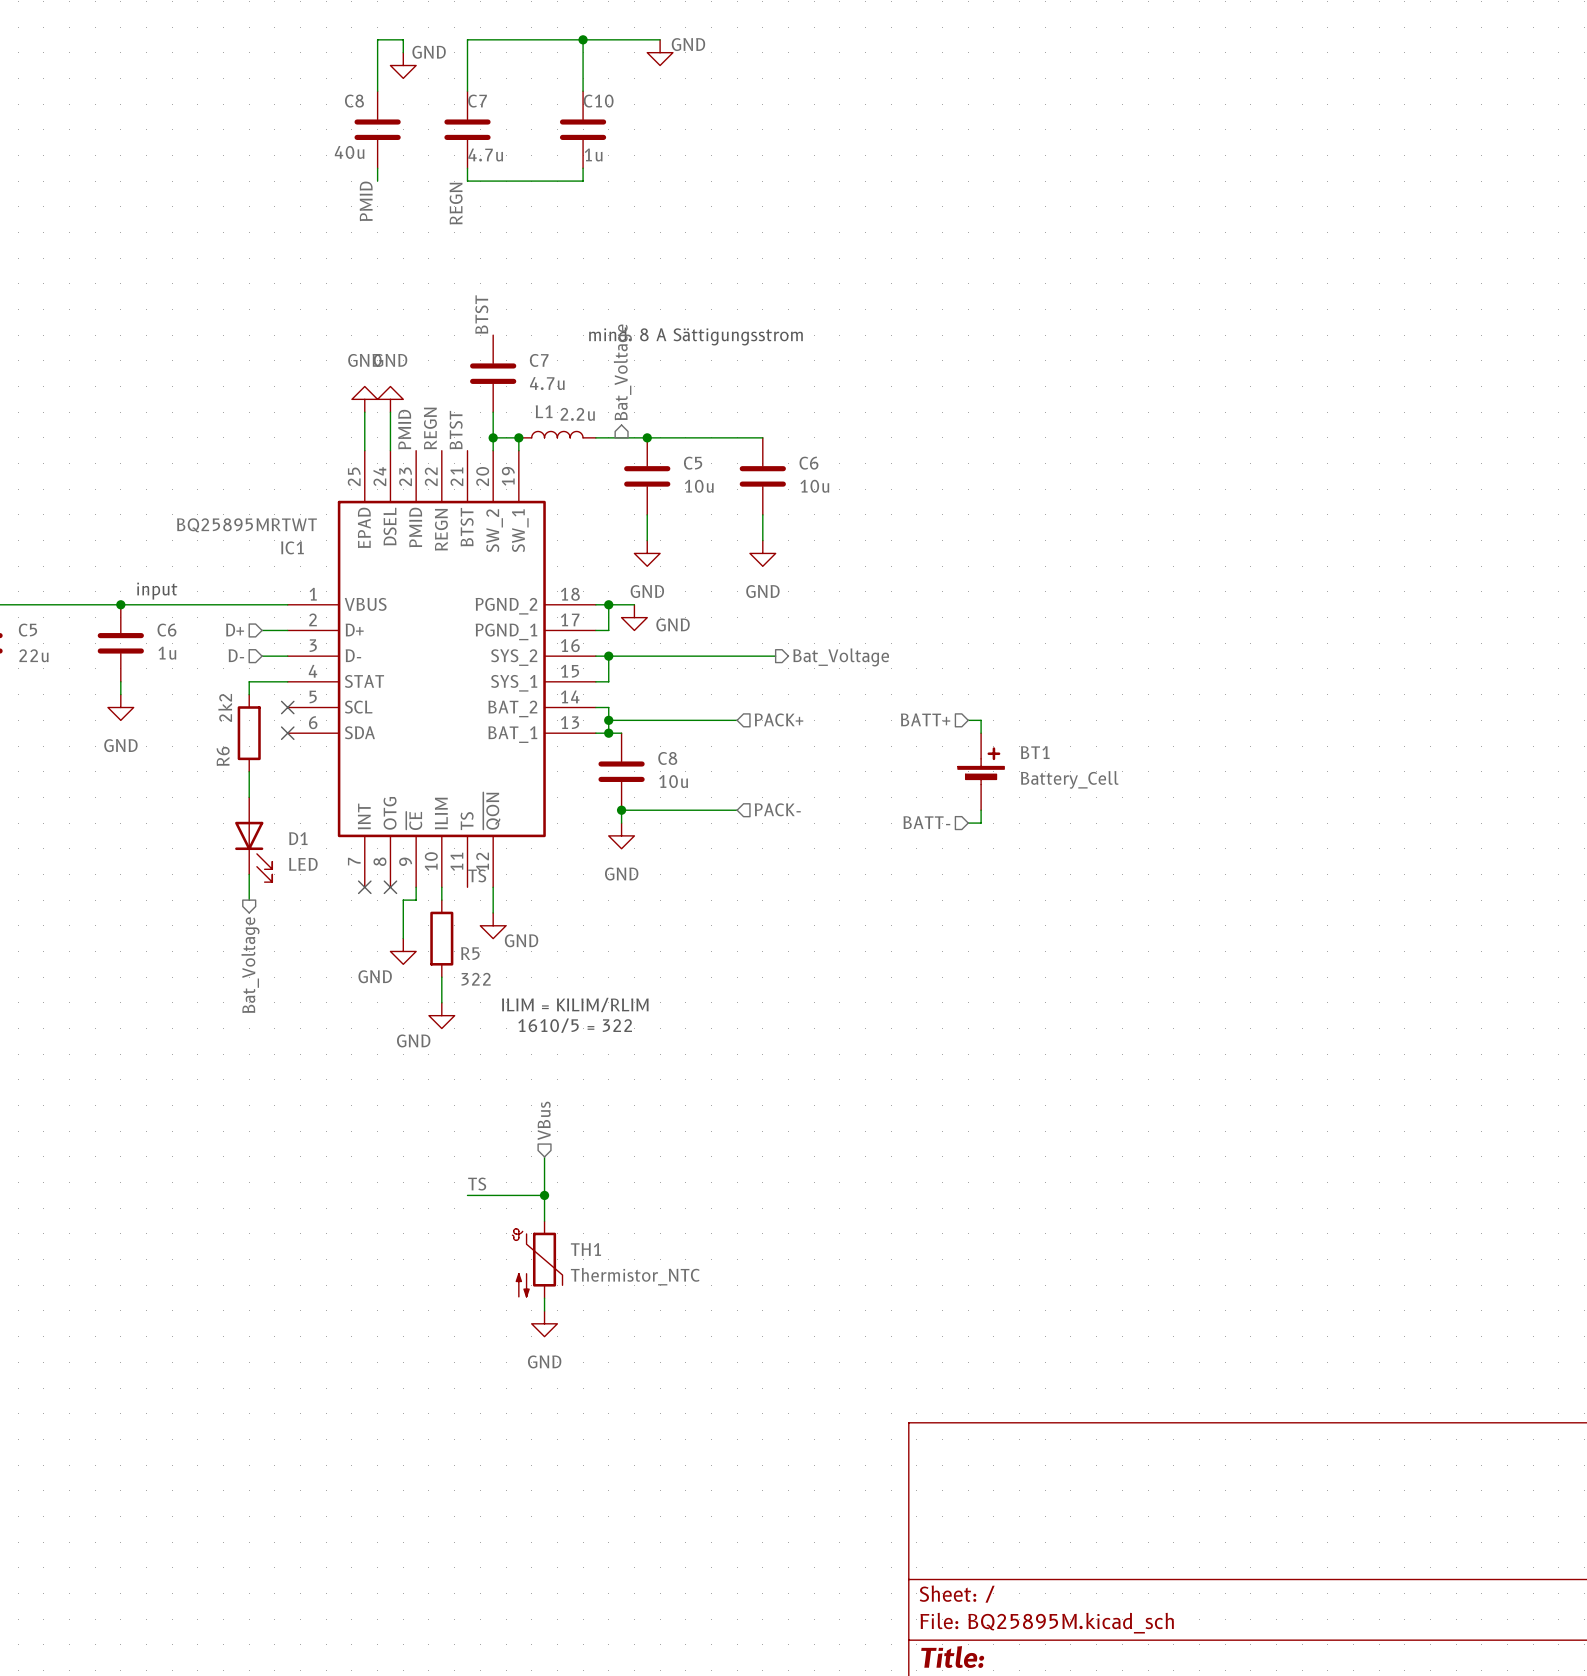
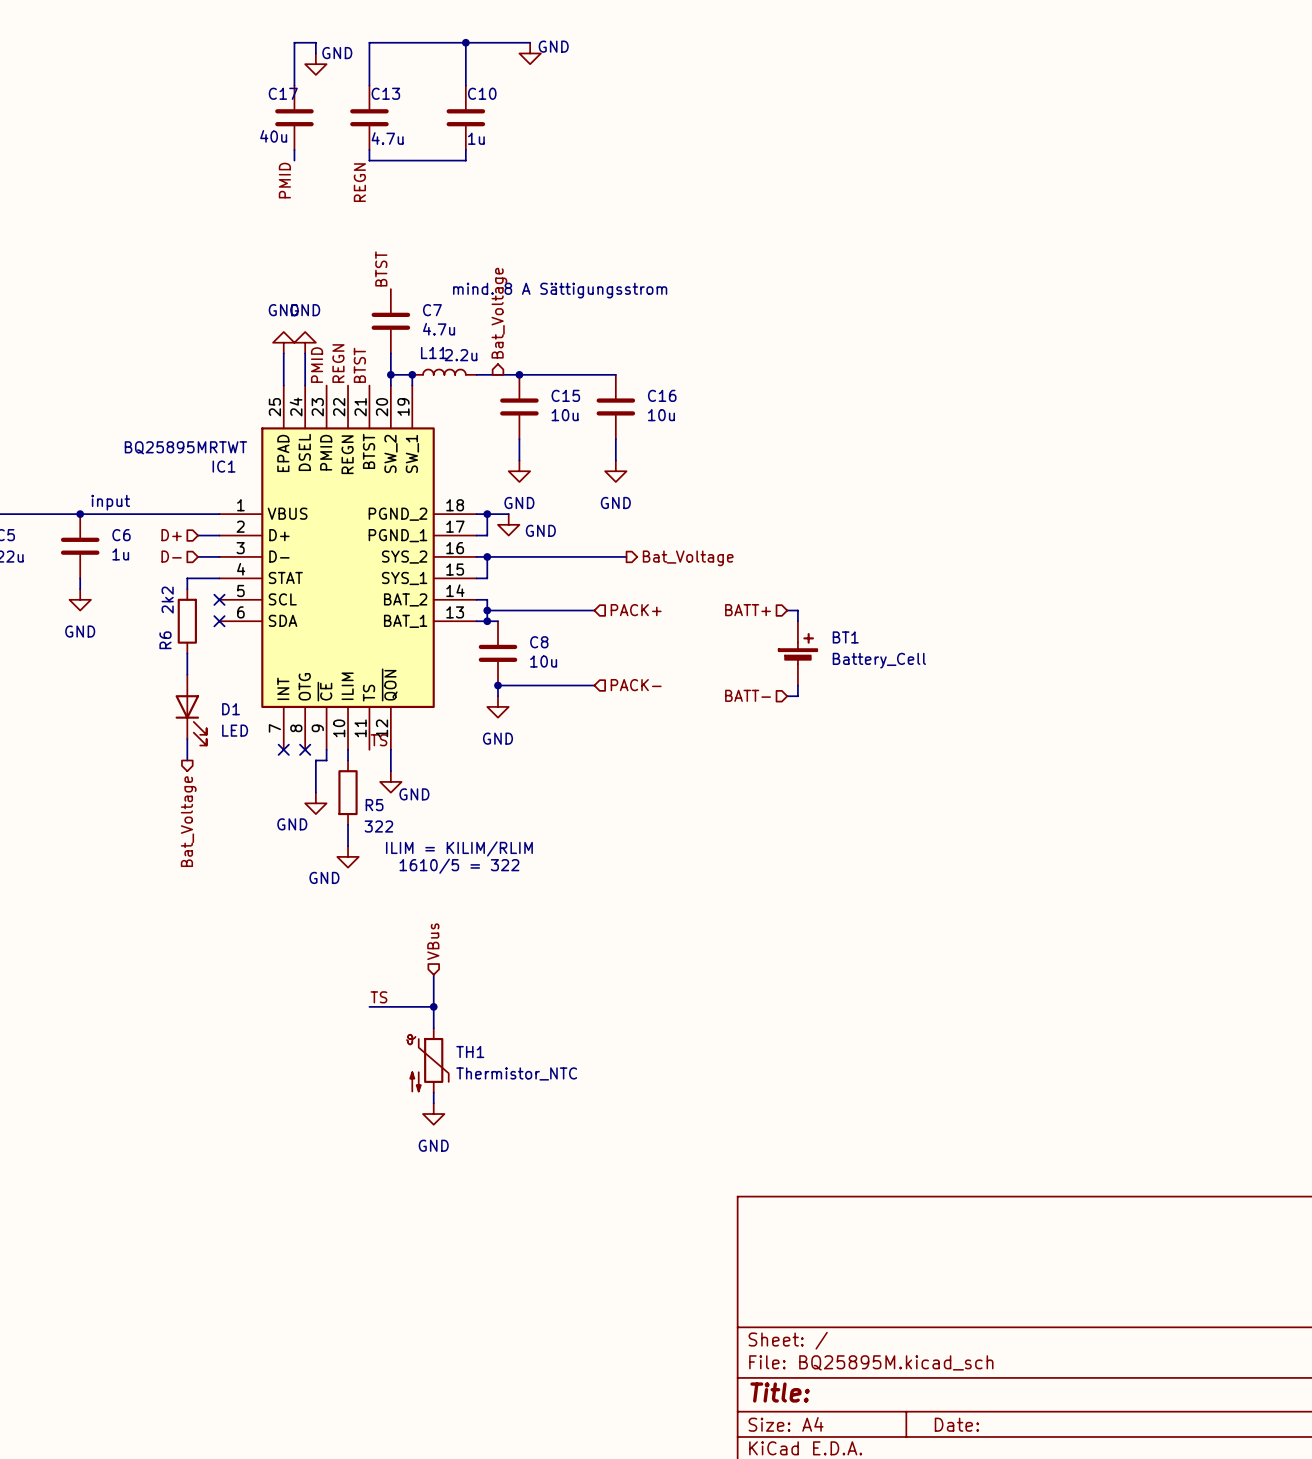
C8 name: C8 (354, 101) -> C17 (283, 93)
C7 name: C7 (477, 101) -> C13 (385, 93)
L1 name: L1 (544, 411) -> L11 (433, 353)
C5 name: C5 (693, 463) -> C15 (565, 395)
C6 name: C6 (808, 463) -> C16 (662, 395)

